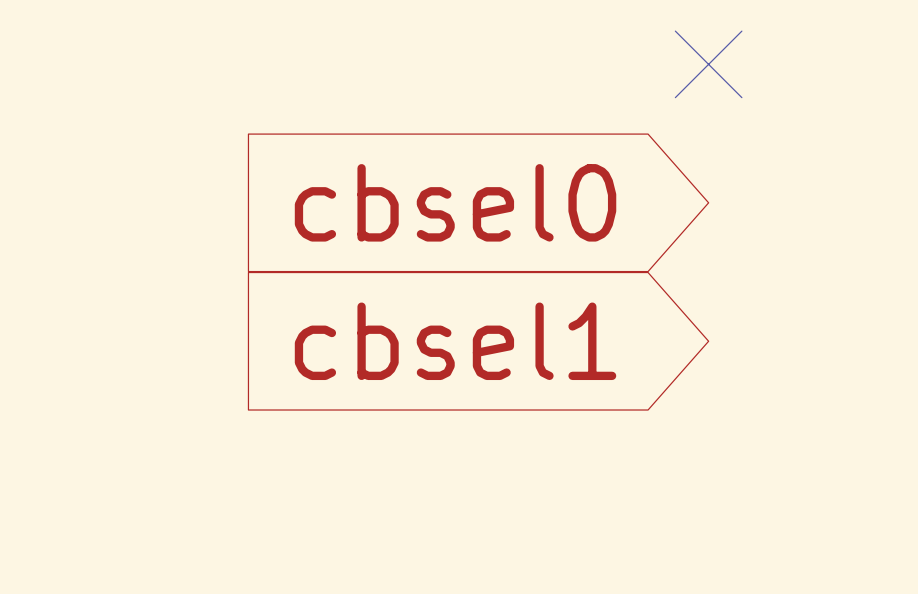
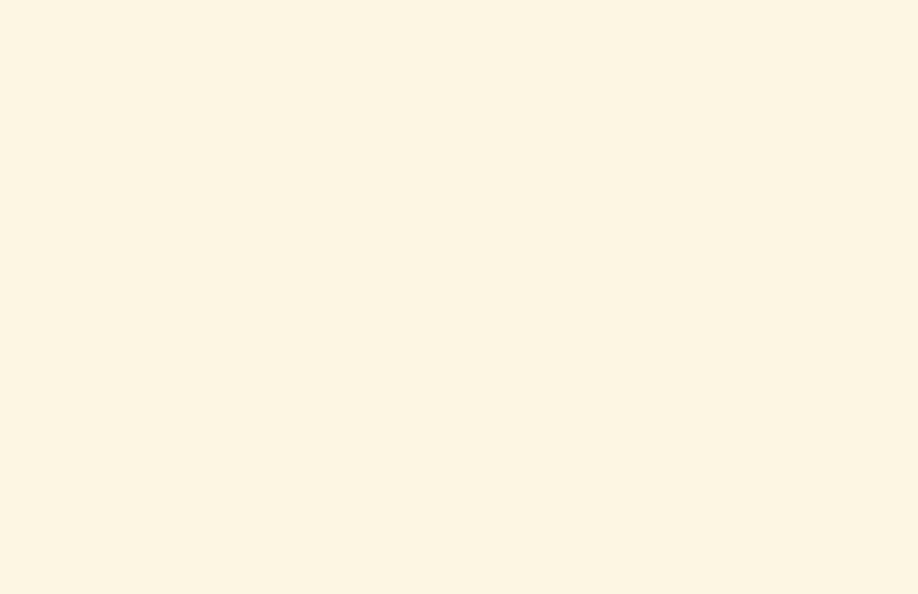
no-connect mark: (708, 64) -> none
global label: cbsel0 (455, 202) -> none
global label: cbsel1 (455, 341) -> none

